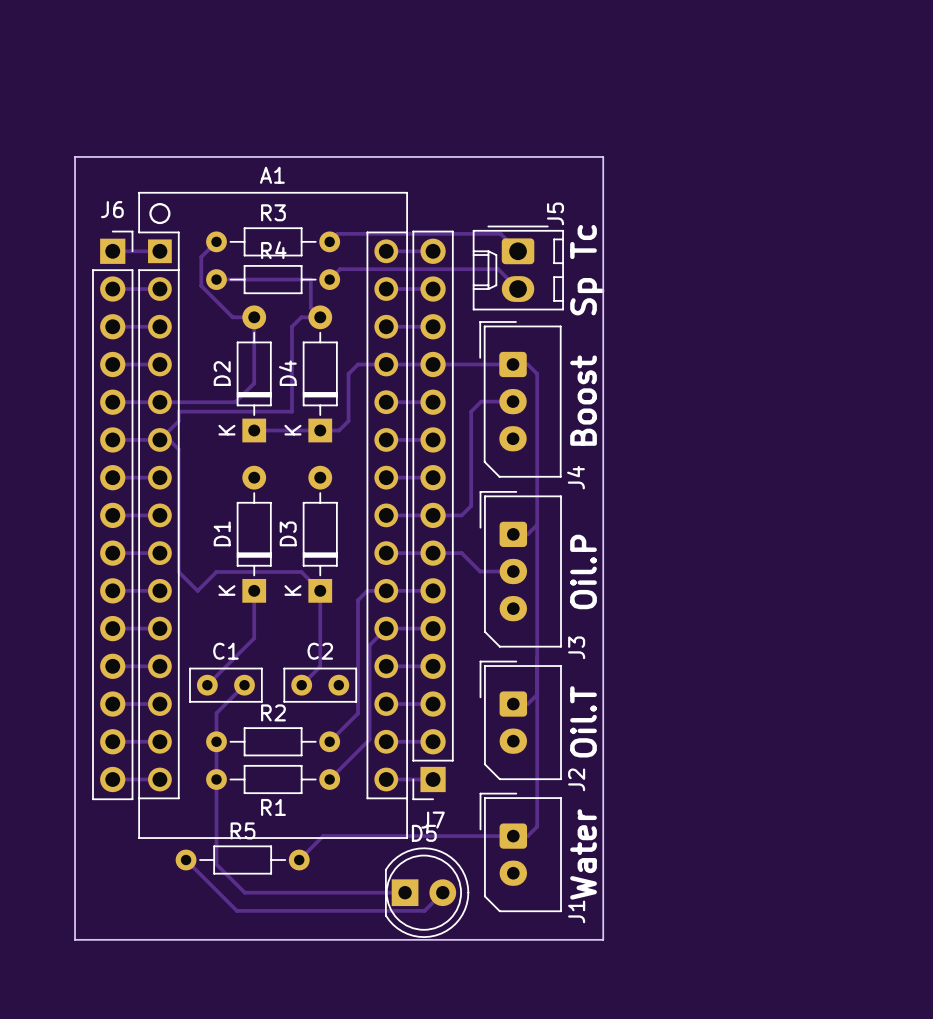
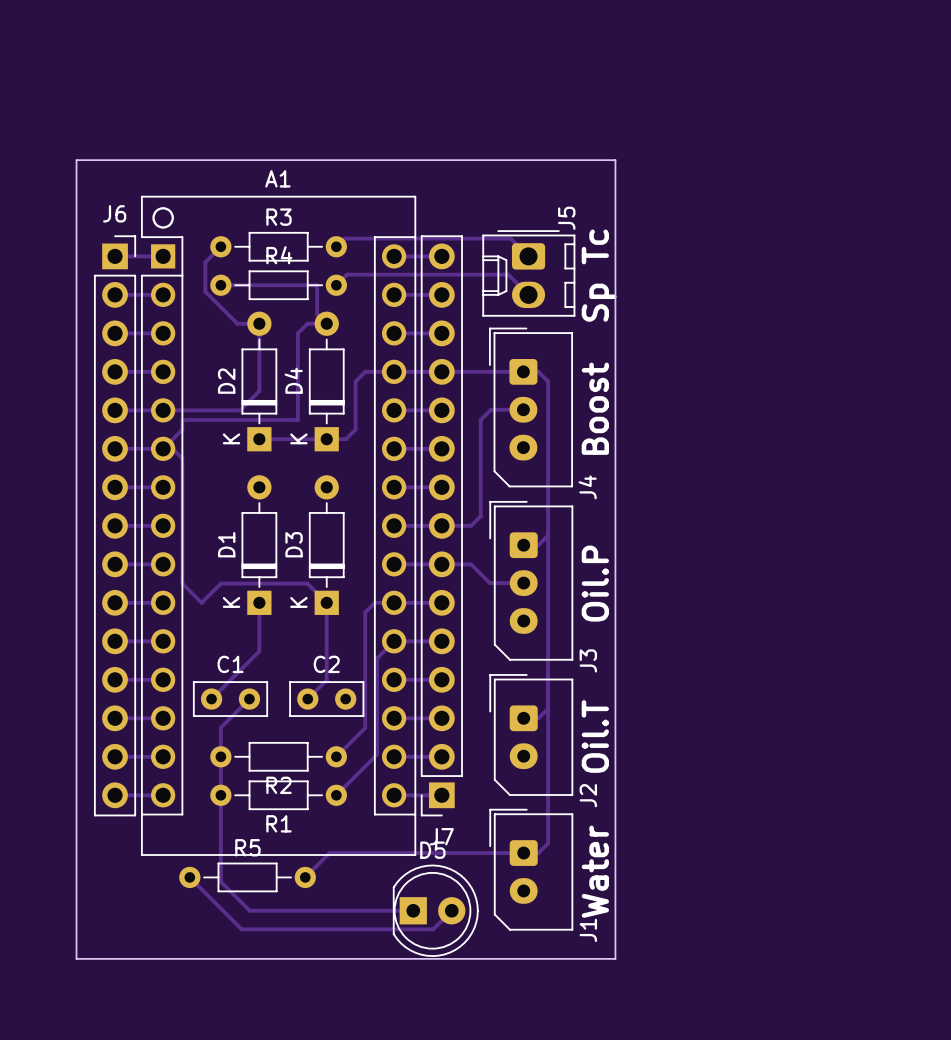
R2 name position: R2 (273, 712) -> R2 (278, 785)

